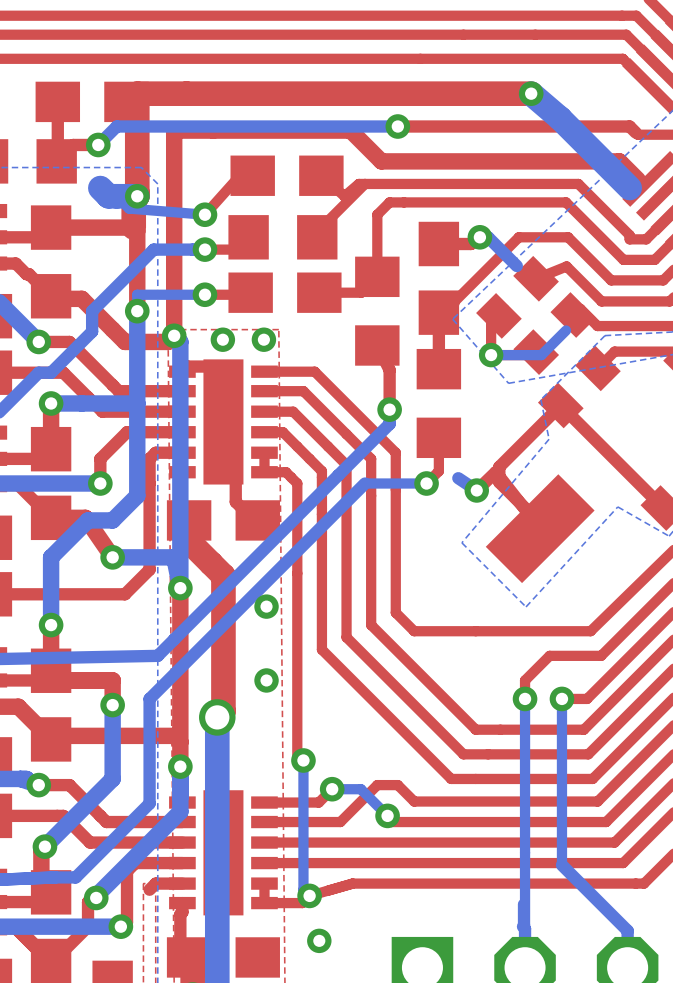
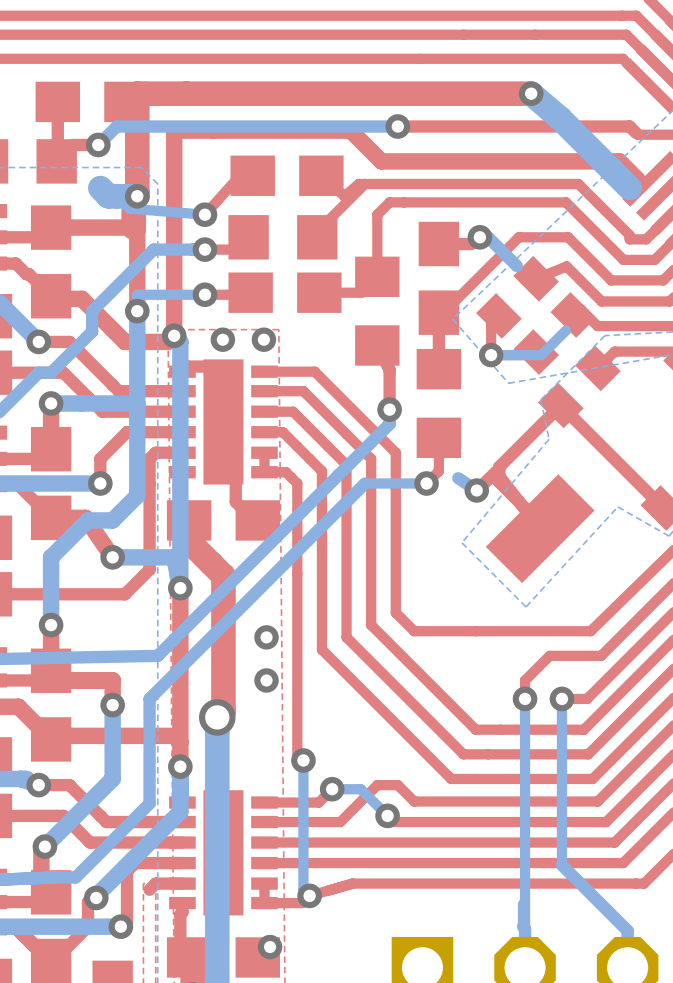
via position: (266, 606) -> (266, 637)
via position: (319, 940) -> (270, 947)

